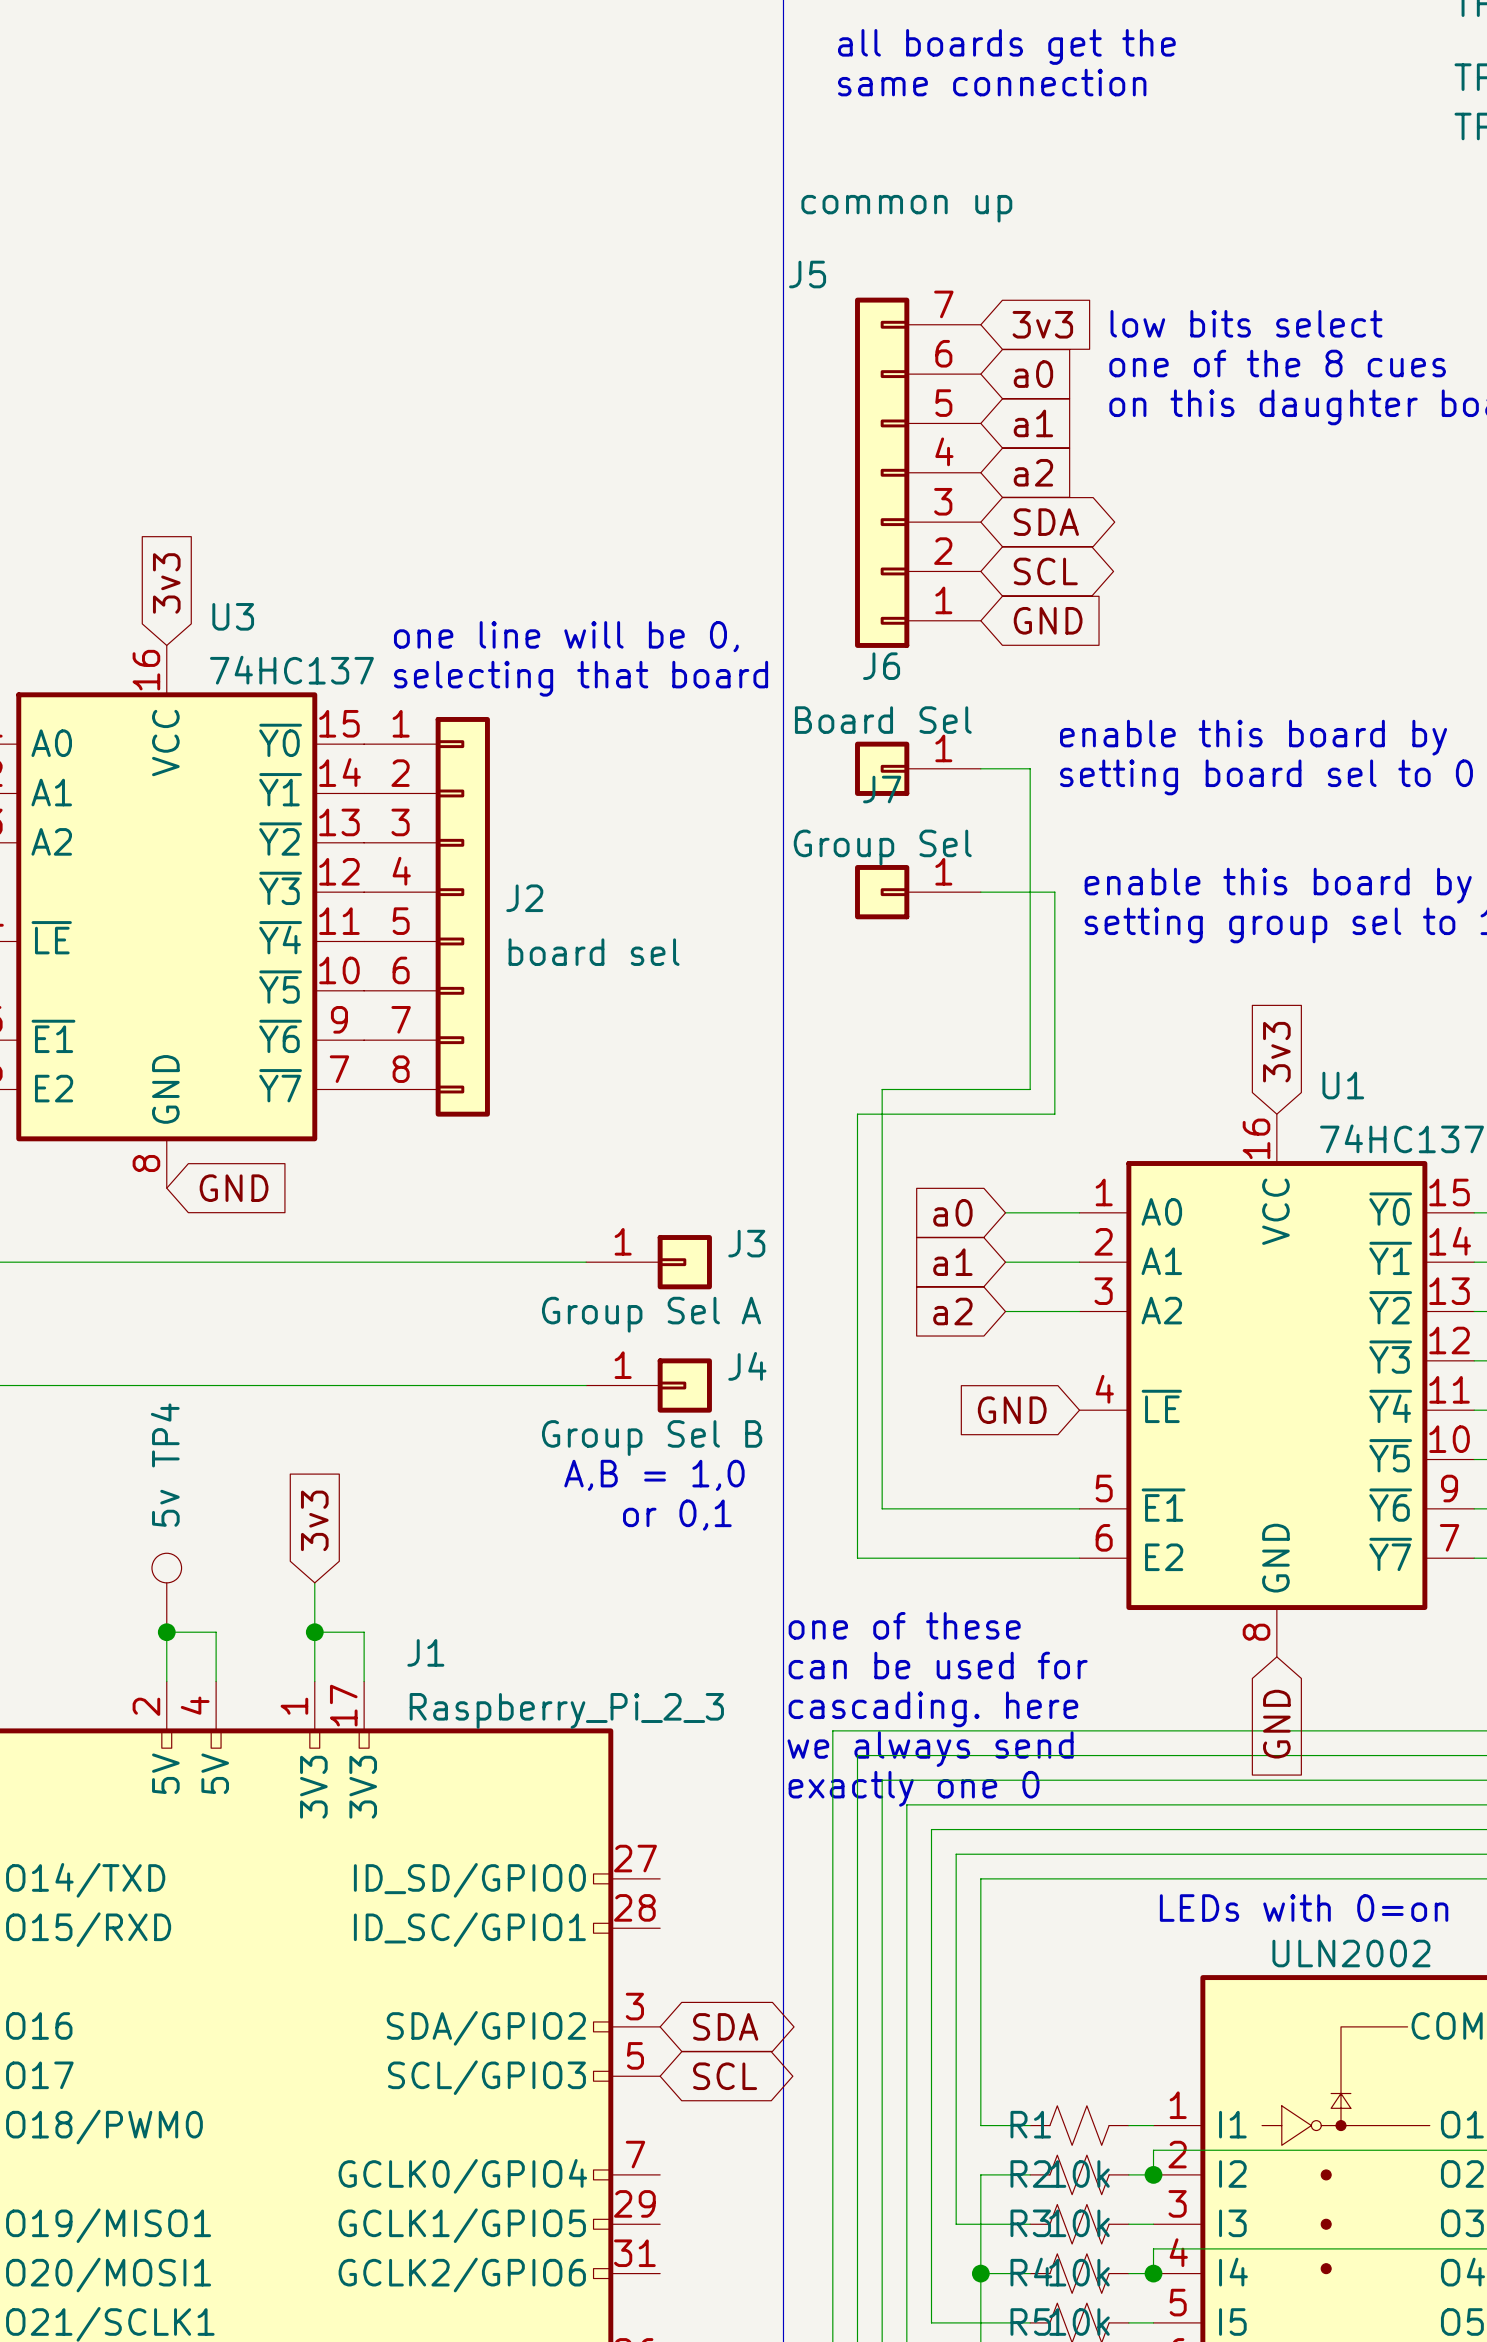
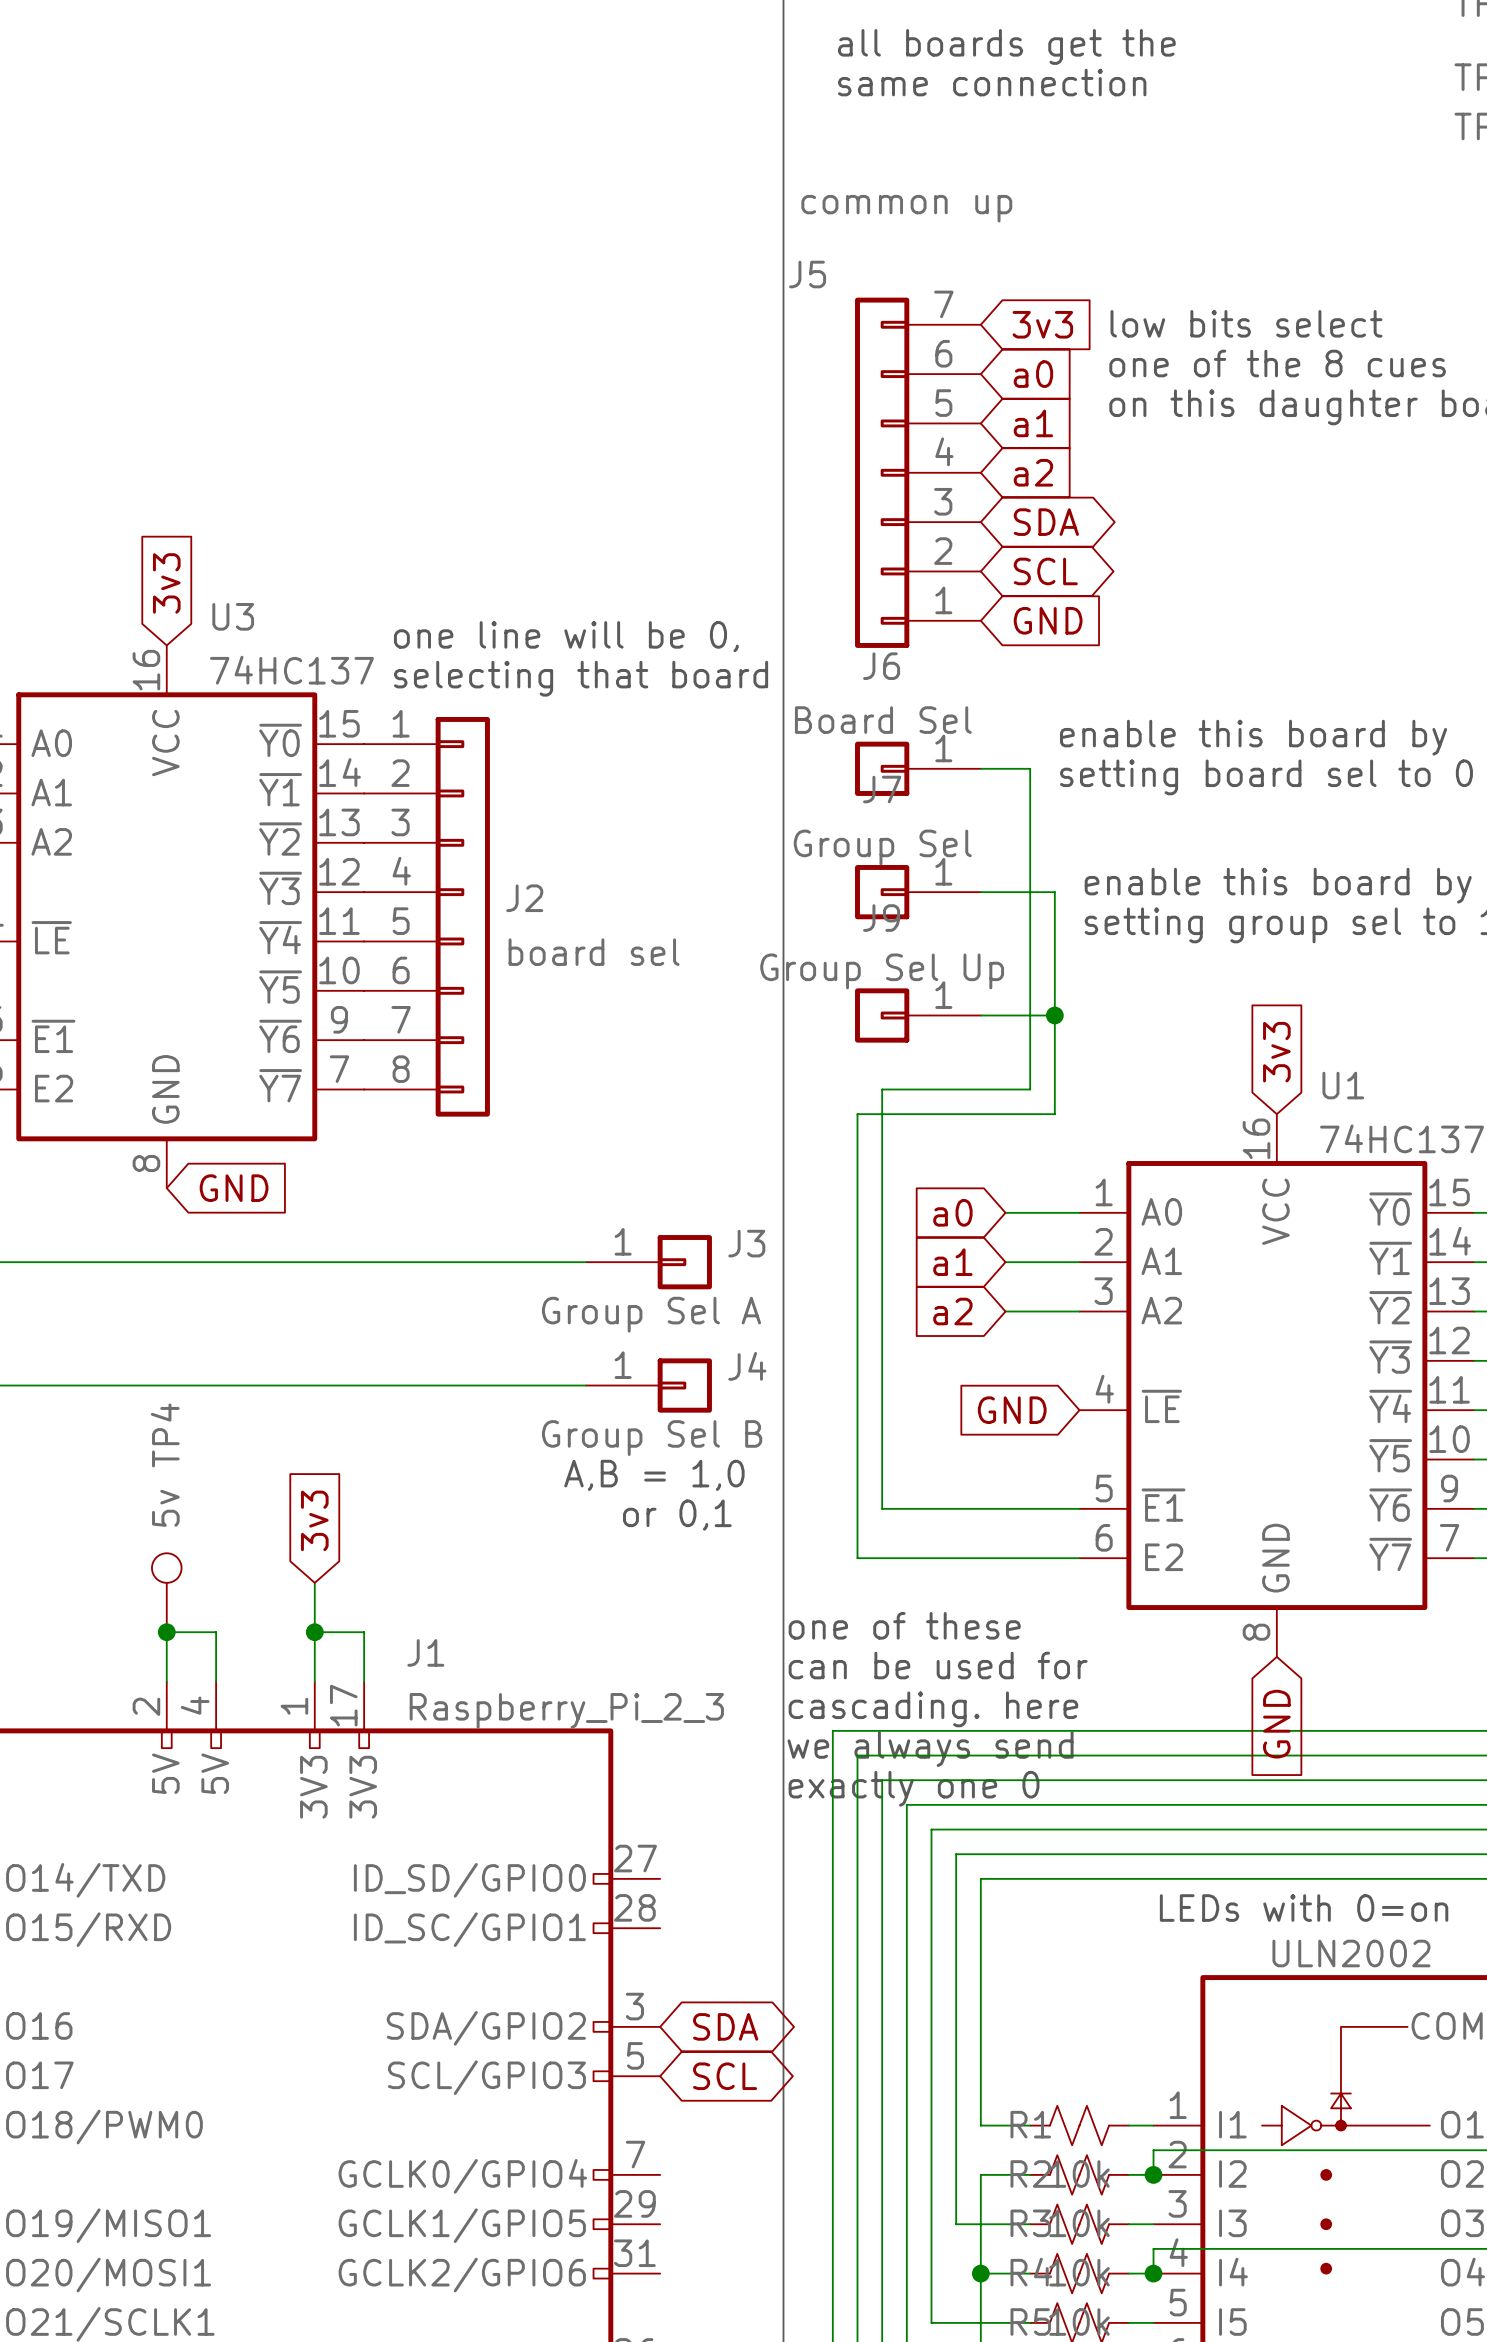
J9: none -> Group Sel Up (917, 1015)
wire: none -> (980, 1015) (1054, 1015)
junction: none -> (1054, 1015)

